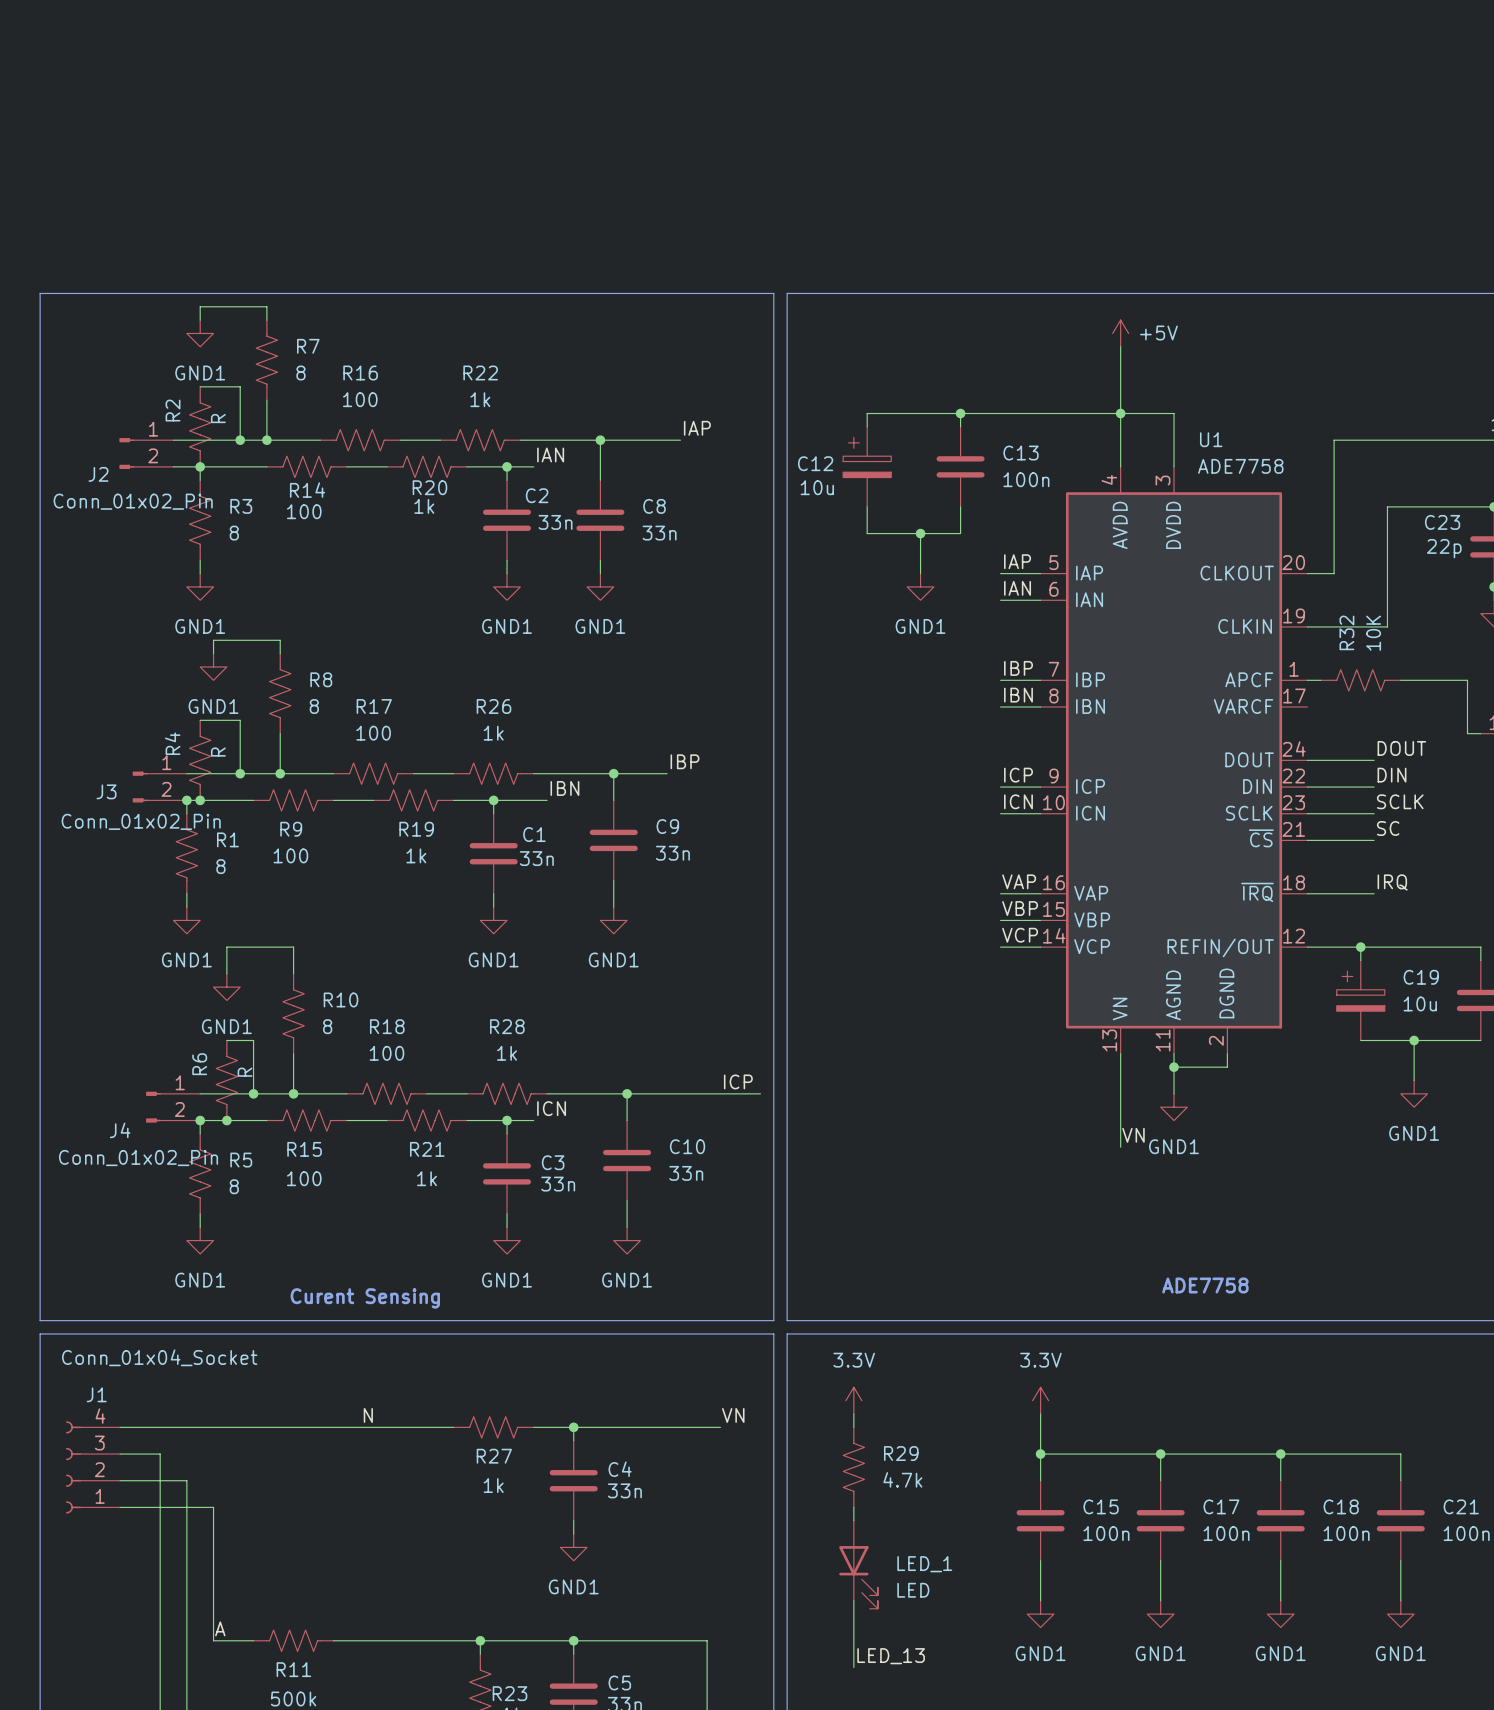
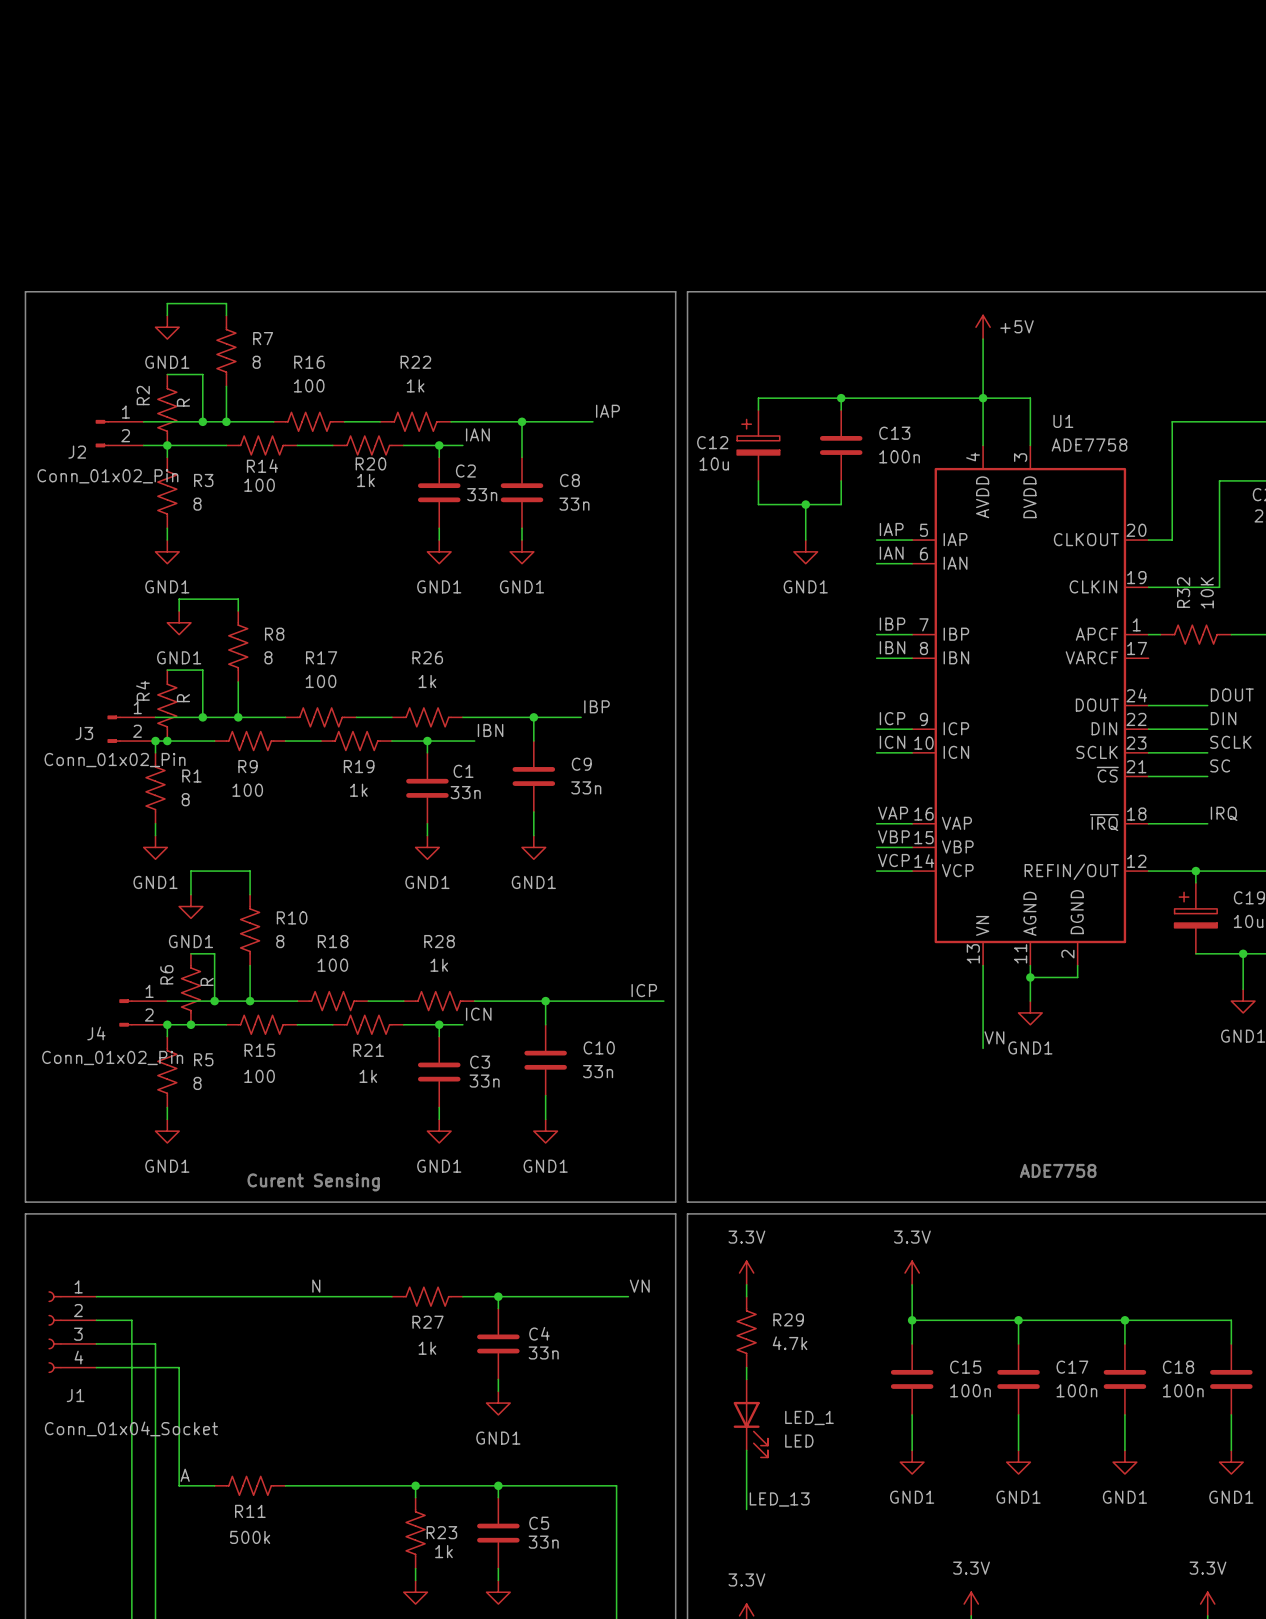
J1 flip: as is (73, 1467) -> up-down (55, 1332)

